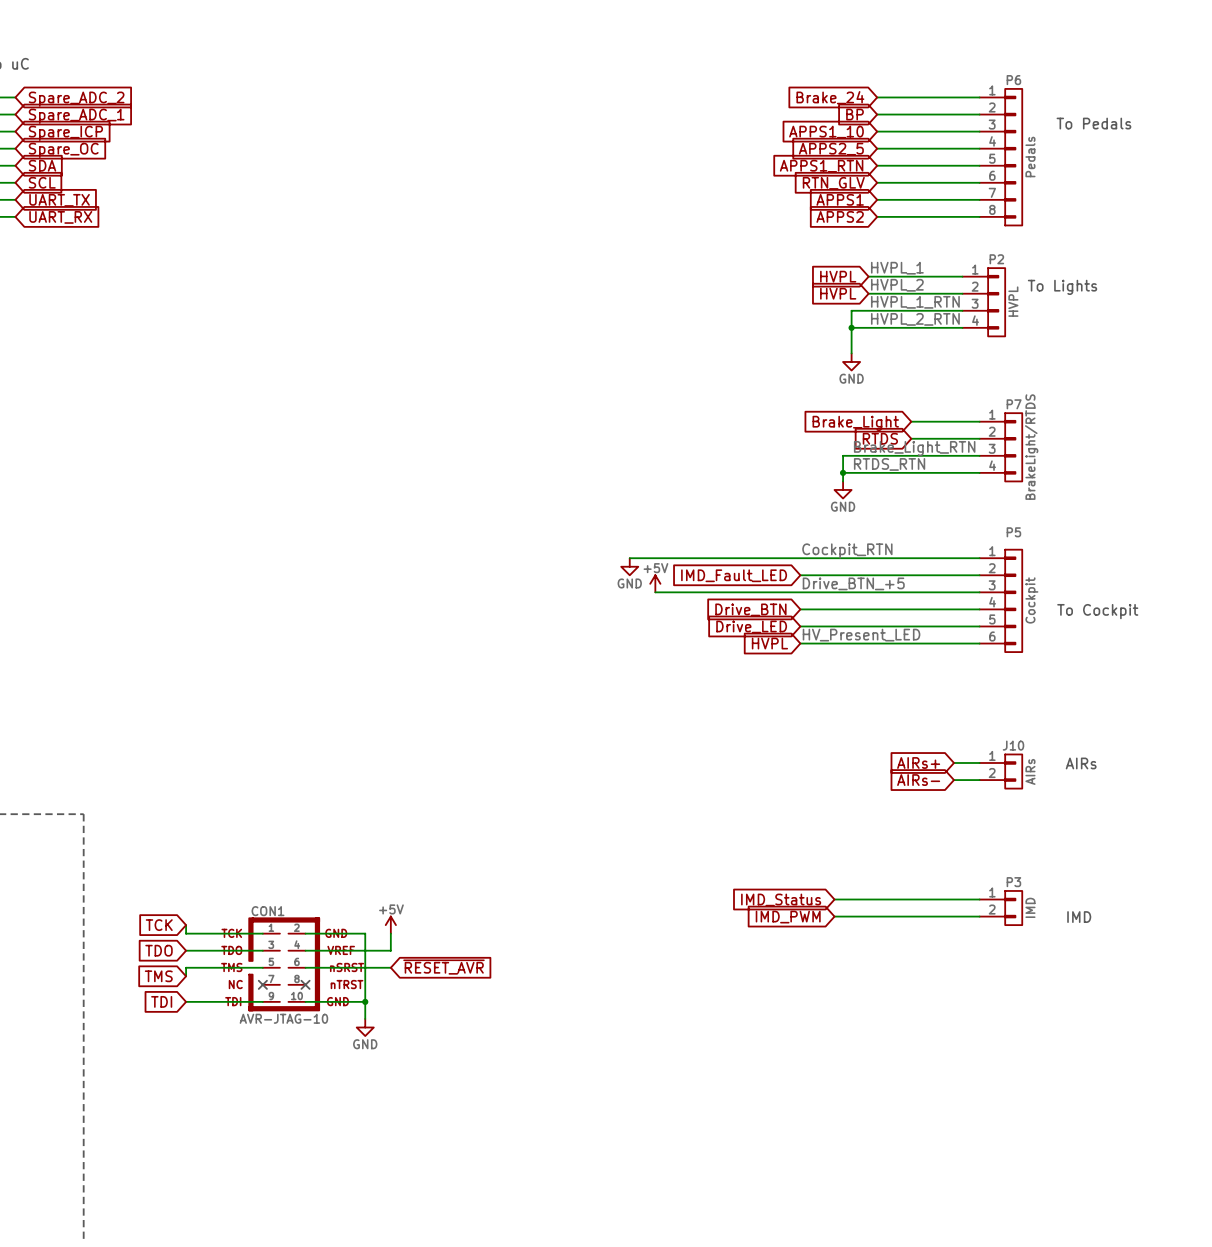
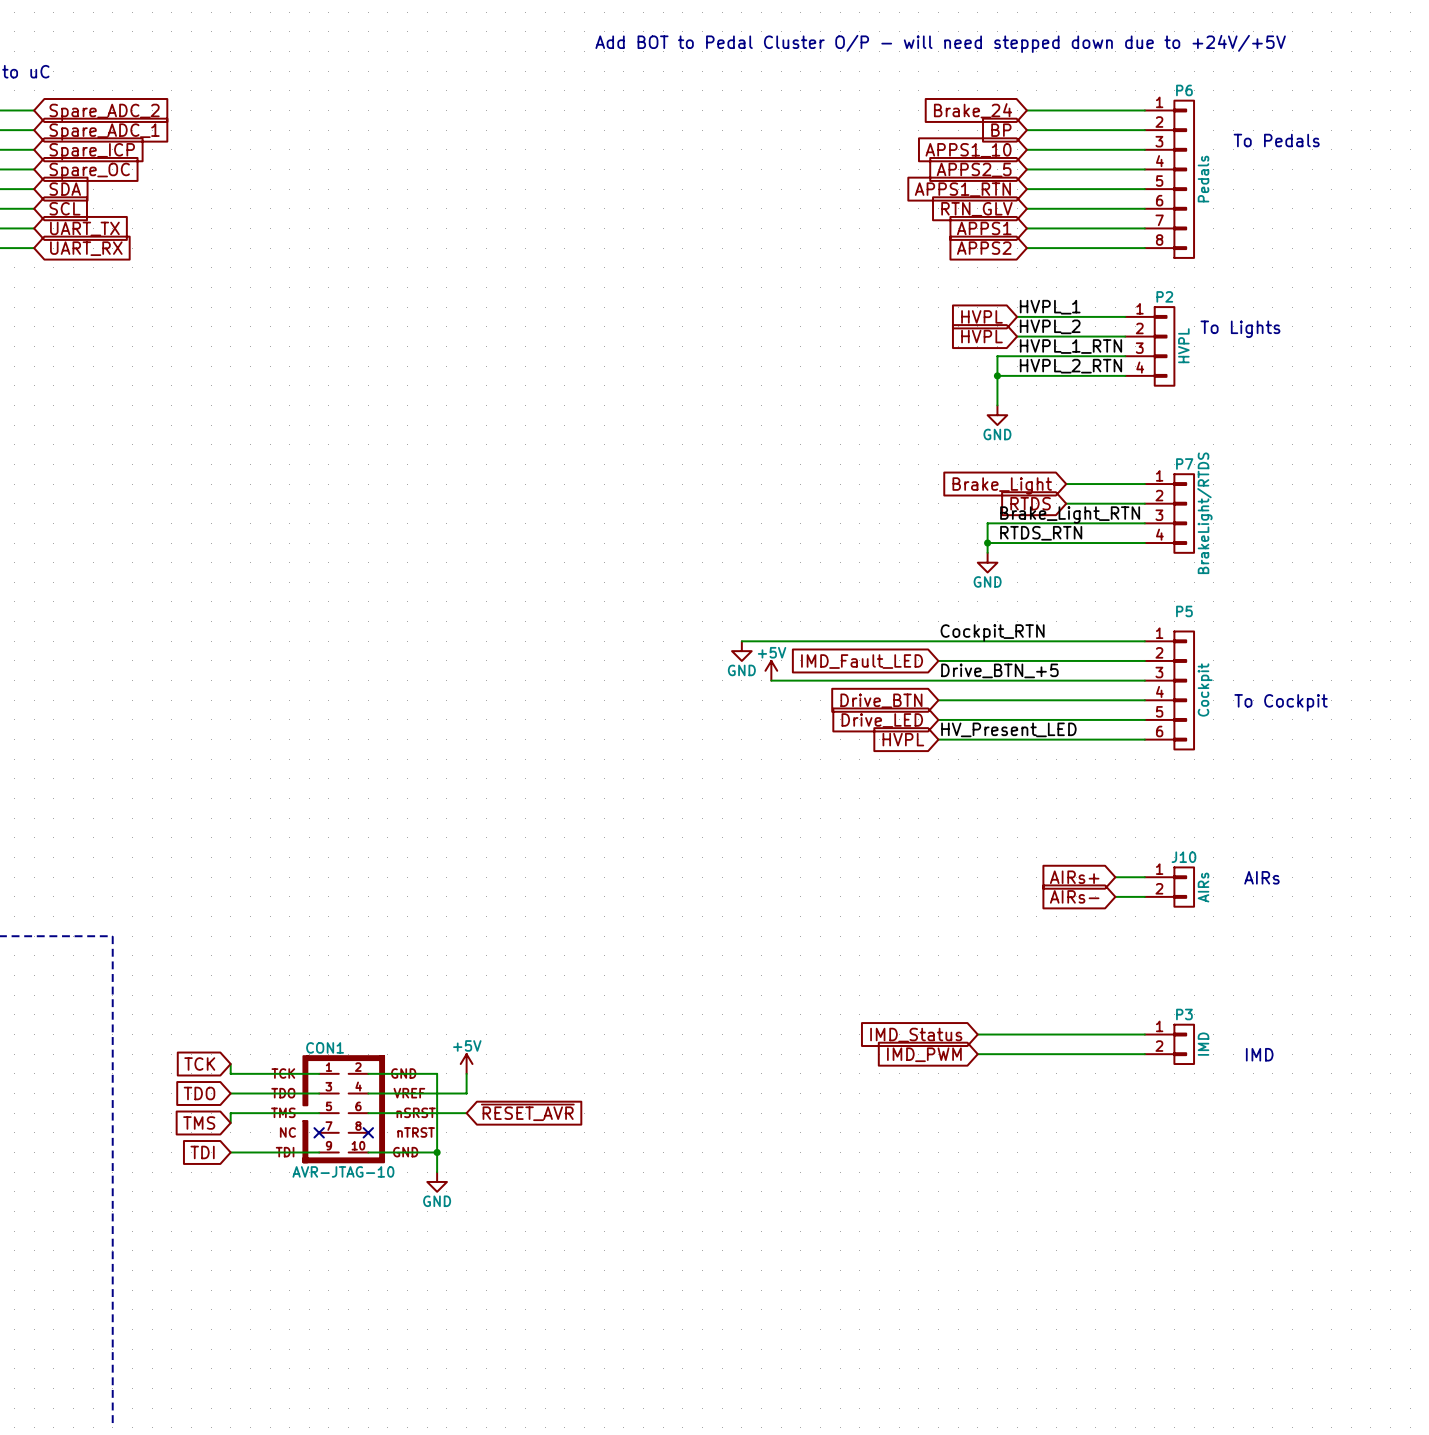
text: none -> Add BOT to Pedal Cluster O/P - will need stepped down due to +24V/+5V (940, 43)

